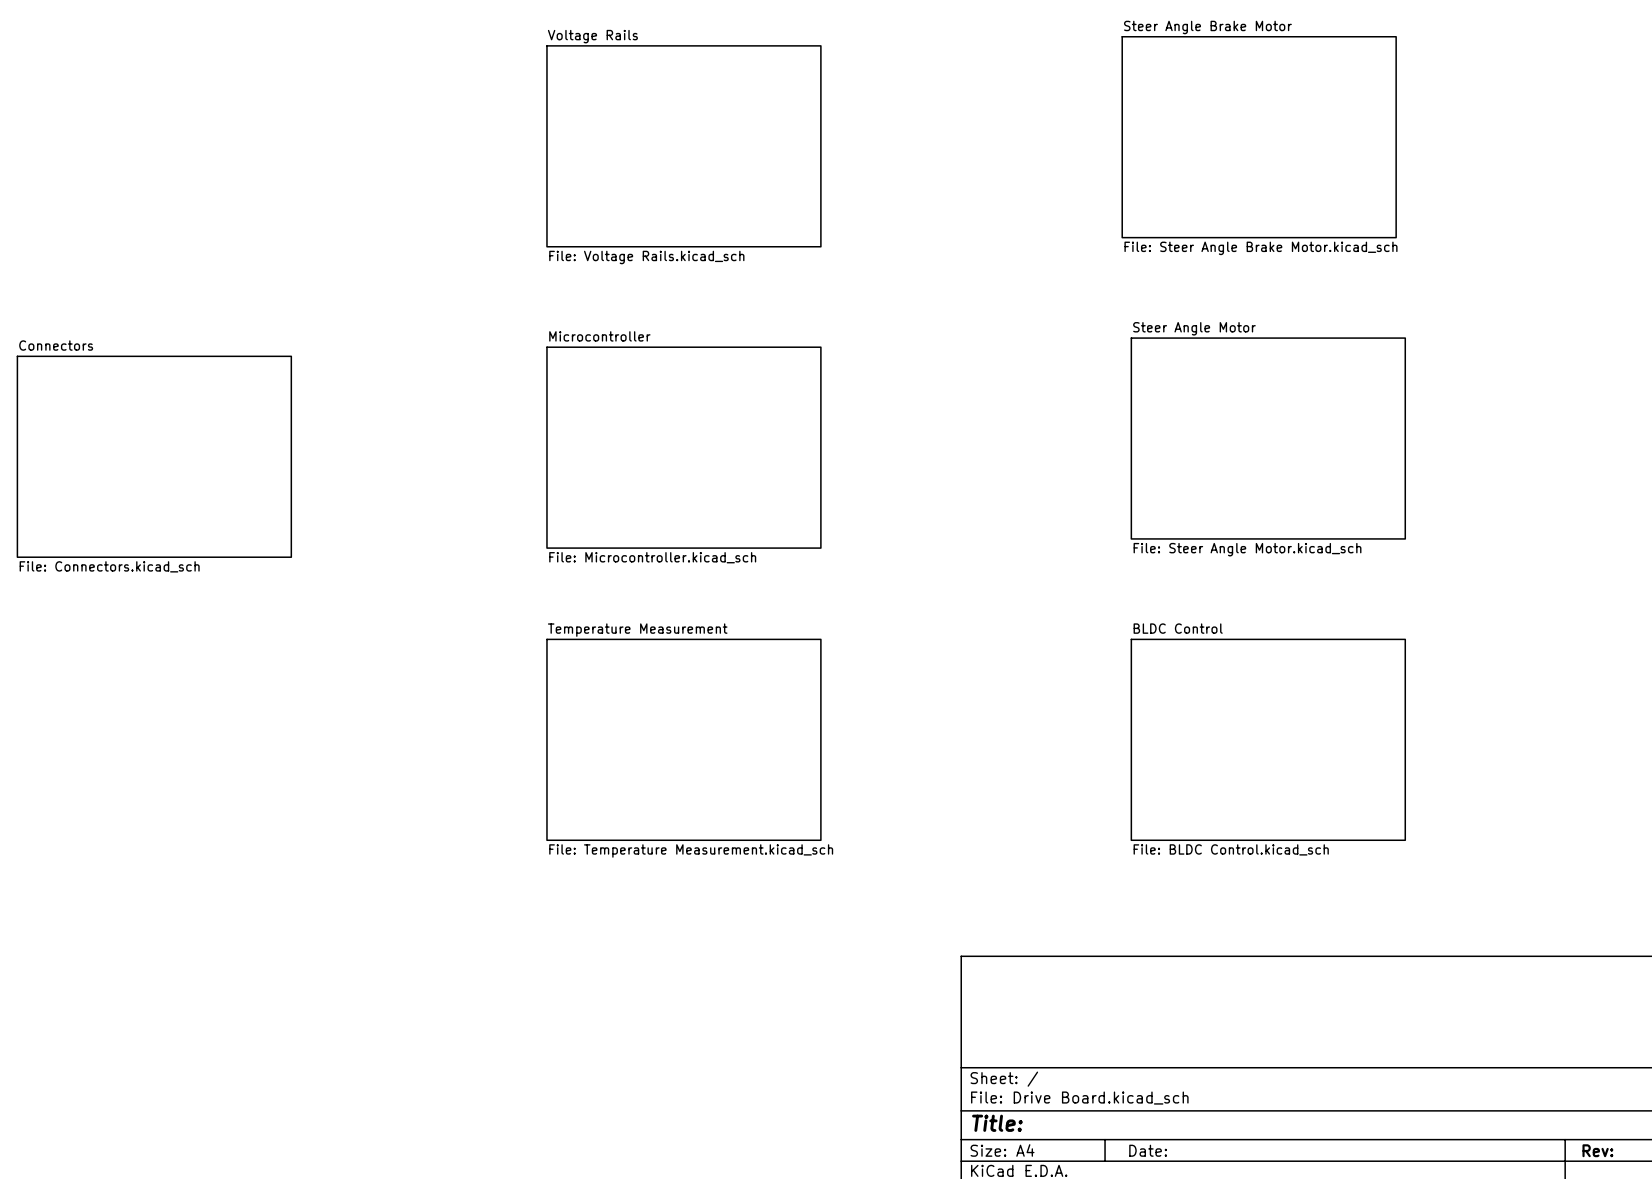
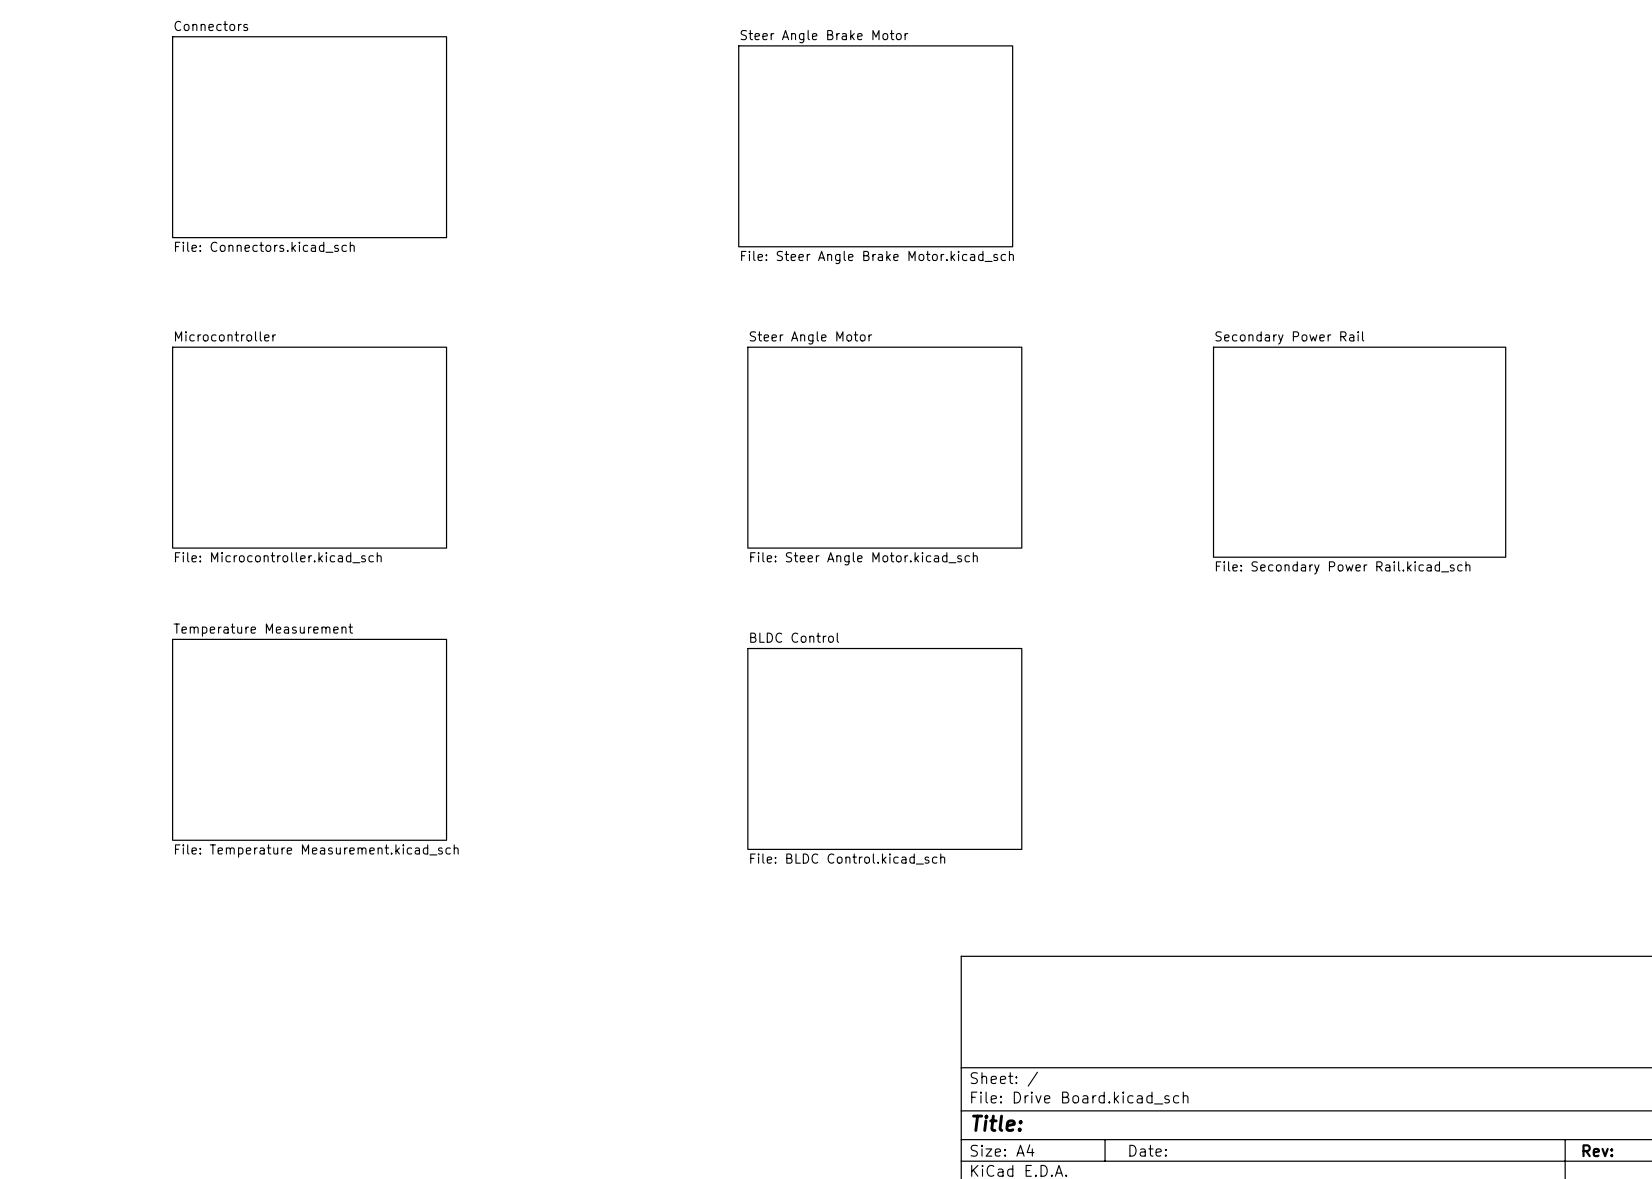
sheet Connectors: none -> File: Connectors.kicad_sch (309, 137)
sheet Steer Angle Brake Motor: File: Steer Angle Brake Motor.kicad_sch (1259, 137) -> none
sheet Voltage Rails: File: Voltage Rails.kicad_sch (683, 146) -> none
sheet Steer Angle Brake Motor: none -> File: Steer Angle Brake Motor.kicad_sch (875, 146)
sheet Steer Angle Motor: File: Steer Angle Motor.kicad_sch (1268, 438) -> none
sheet Microcontroller: none -> File: Microcontroller.kicad_sch (309, 447)
sheet Microcontroller: File: Microcontroller.kicad_sch (683, 447) -> none
sheet Steer Angle Motor: none -> File: Steer Angle Motor.kicad_sch (884, 447)
sheet Secondary Power Rail: none -> File: Secondary Power Rail.kicad_sch (1359, 452)
sheet Connectors: File: Connectors.kicad_sch (154, 456) -> none
sheet Temperature Measurement: none -> File: Temperature Measurement.kicad_sch (309, 739)
sheet Temperature Measurement: File: Temperature Measurement.kicad_sch (683, 739) -> none
sheet BLDC Control: File: BLDC Control.kicad_sch (1268, 739) -> none
sheet BLDC Control: none -> File: BLDC Control.kicad_sch (884, 748)

